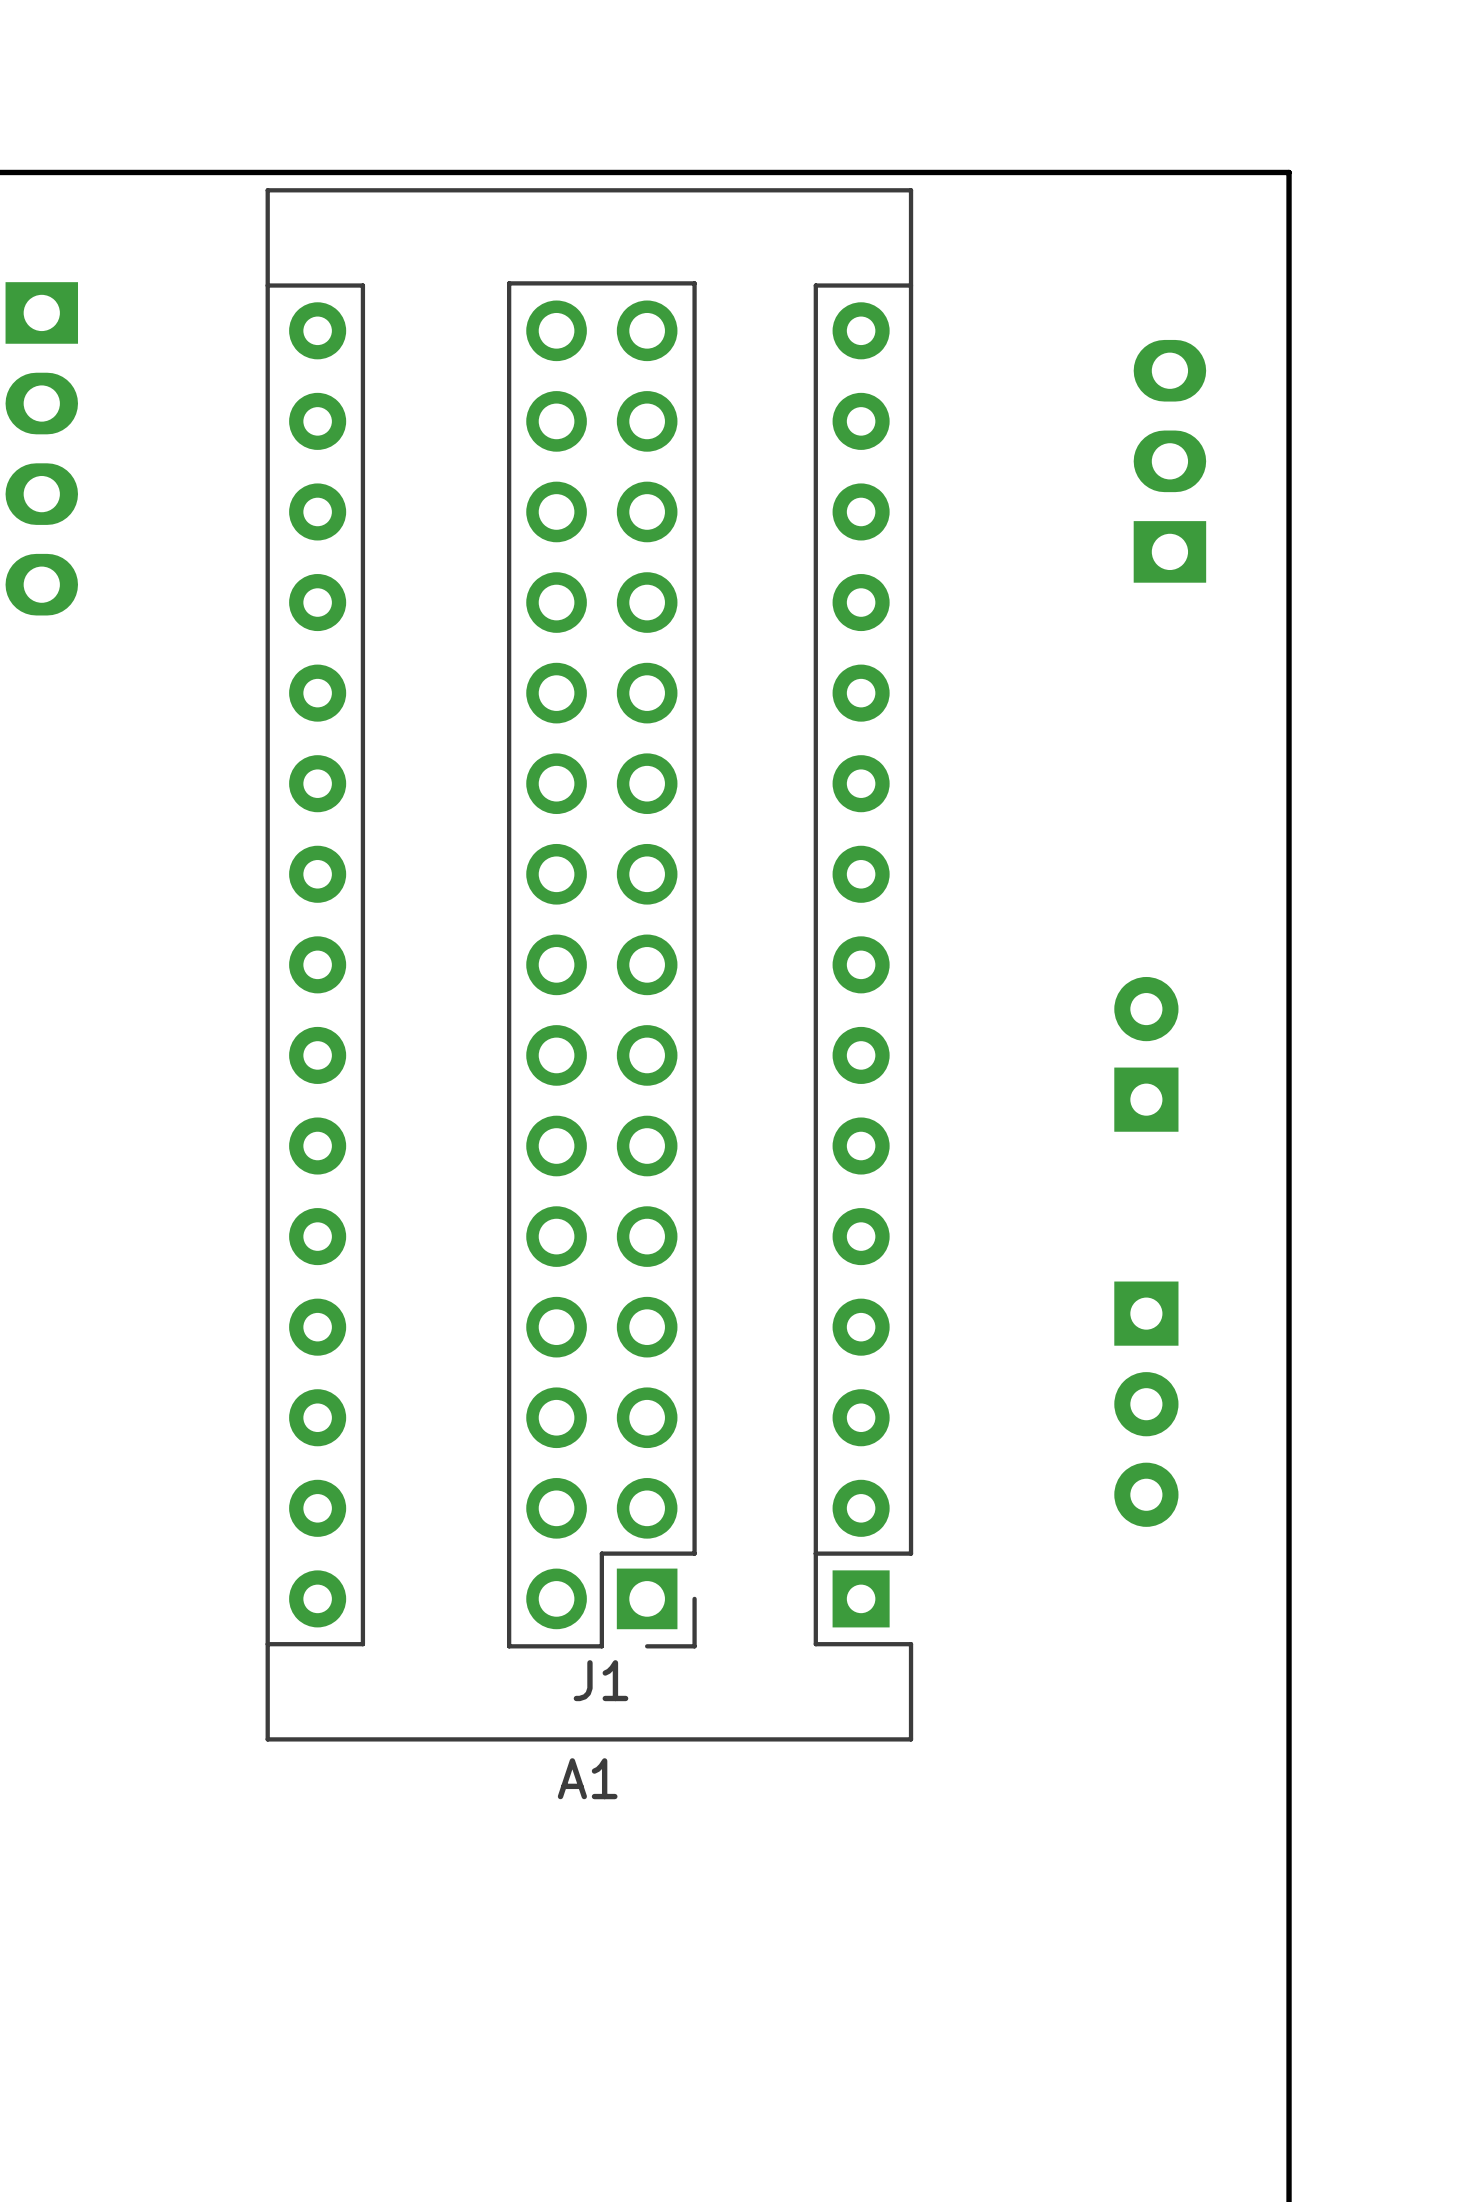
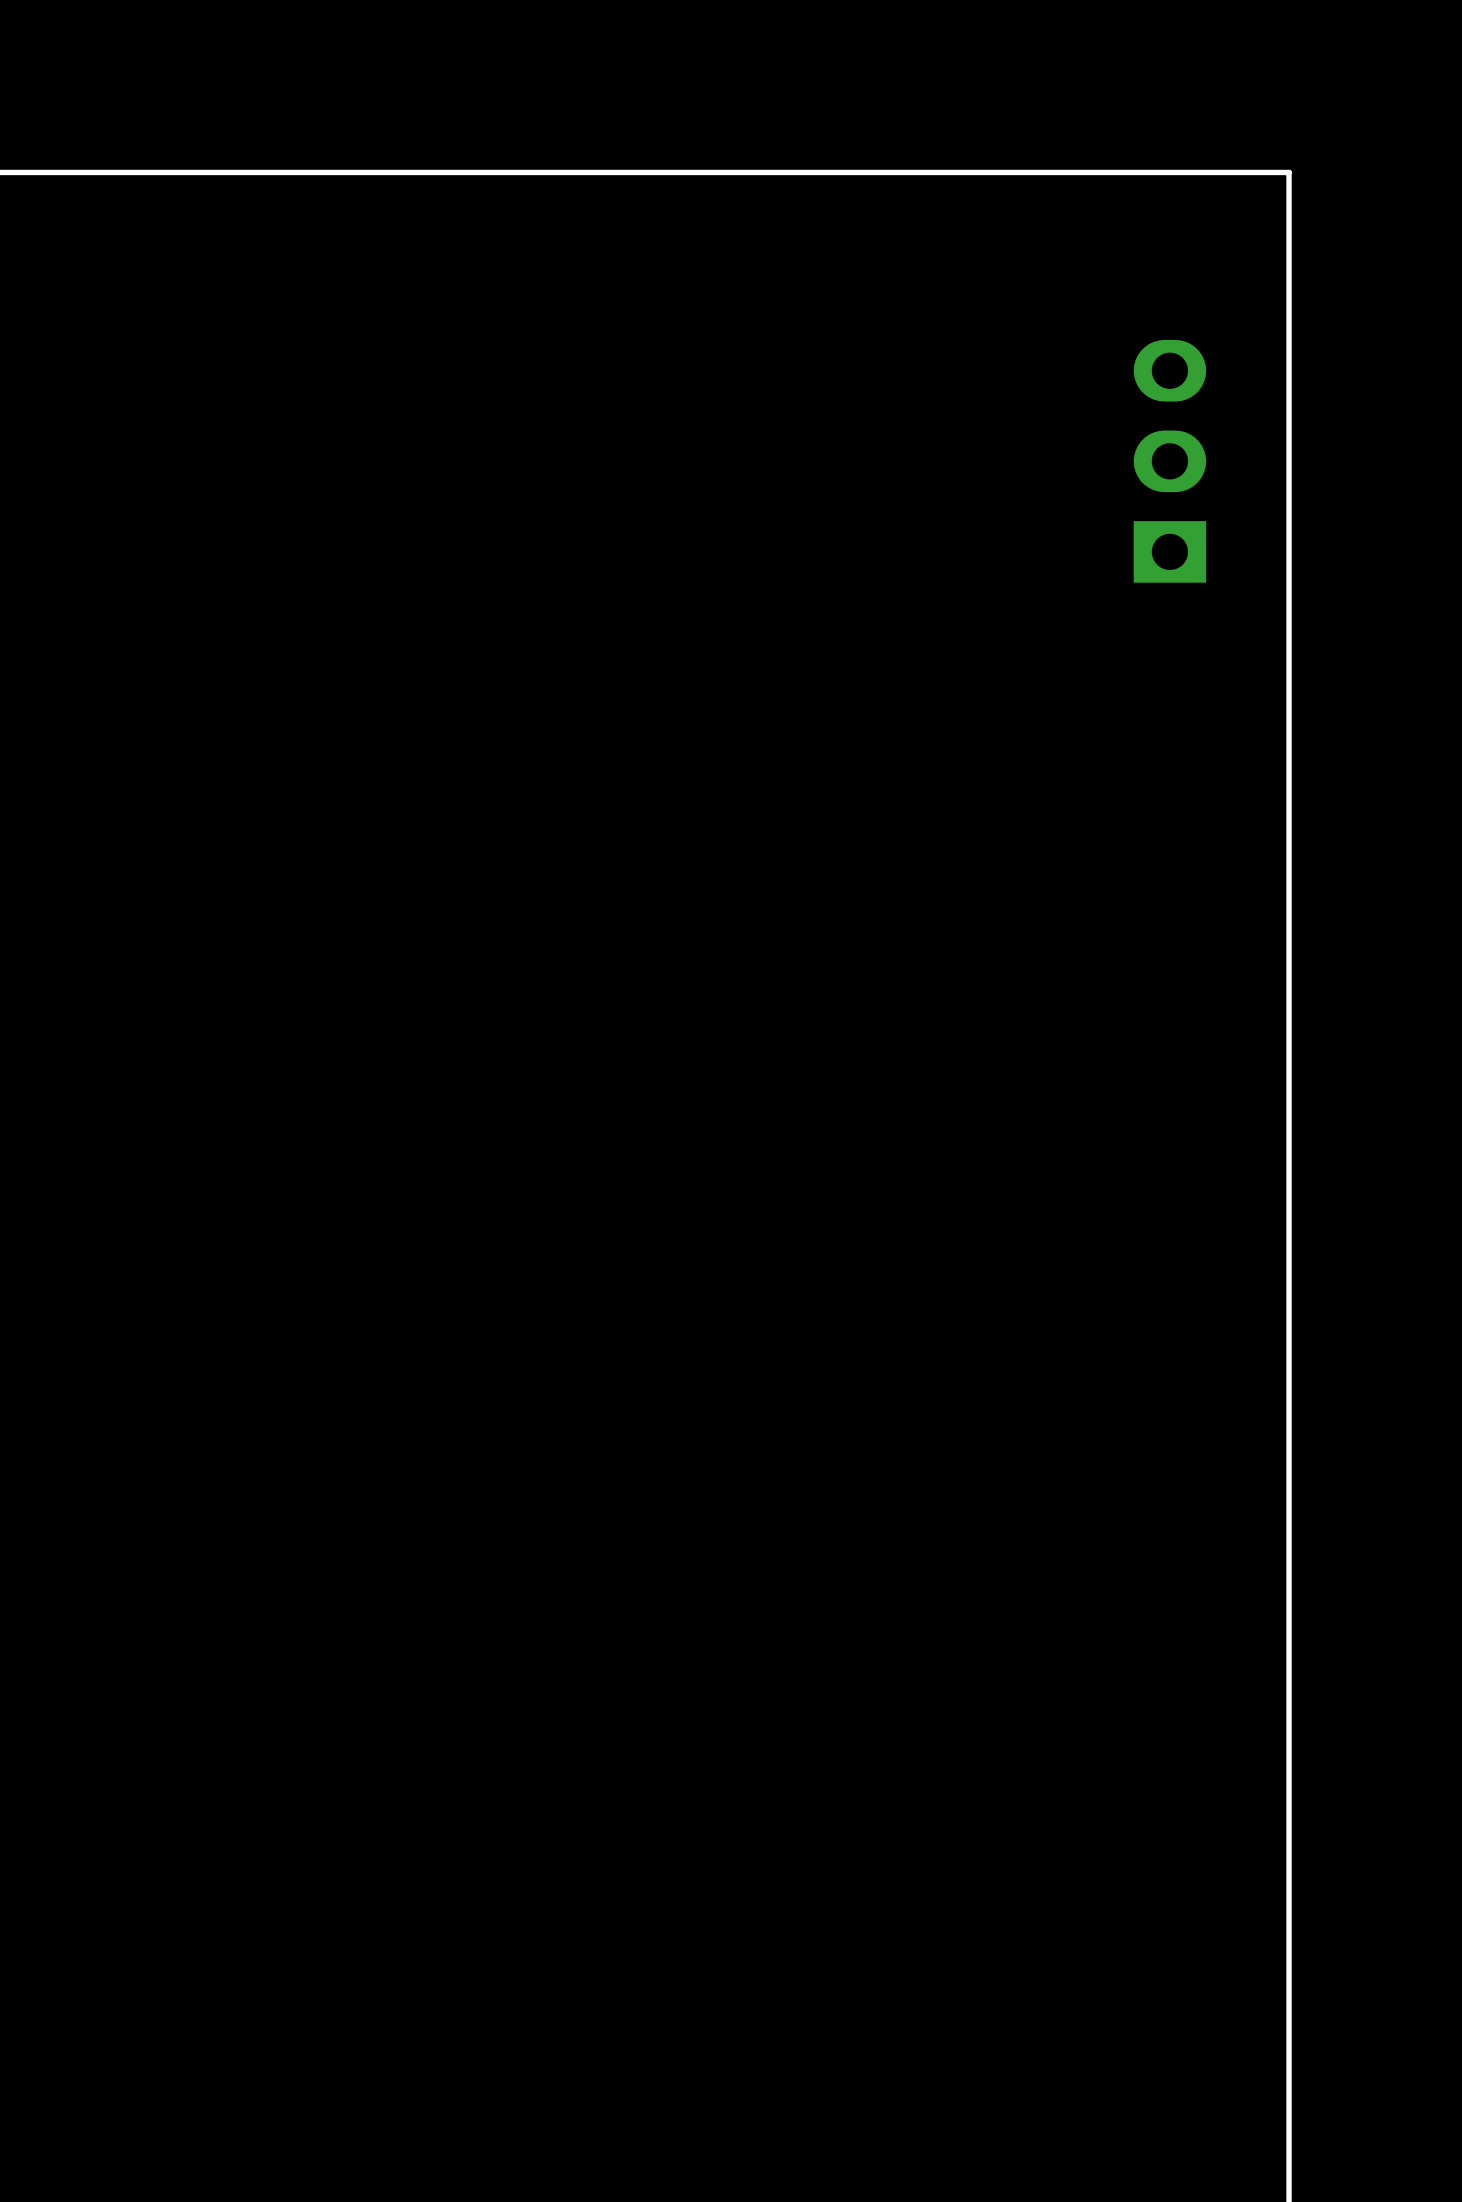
part: (41, 448) -> none
A1: (589, 964) -> none
J1: (601, 964) -> none
part: (1146, 1054) -> none
part: (1146, 1404) -> none

